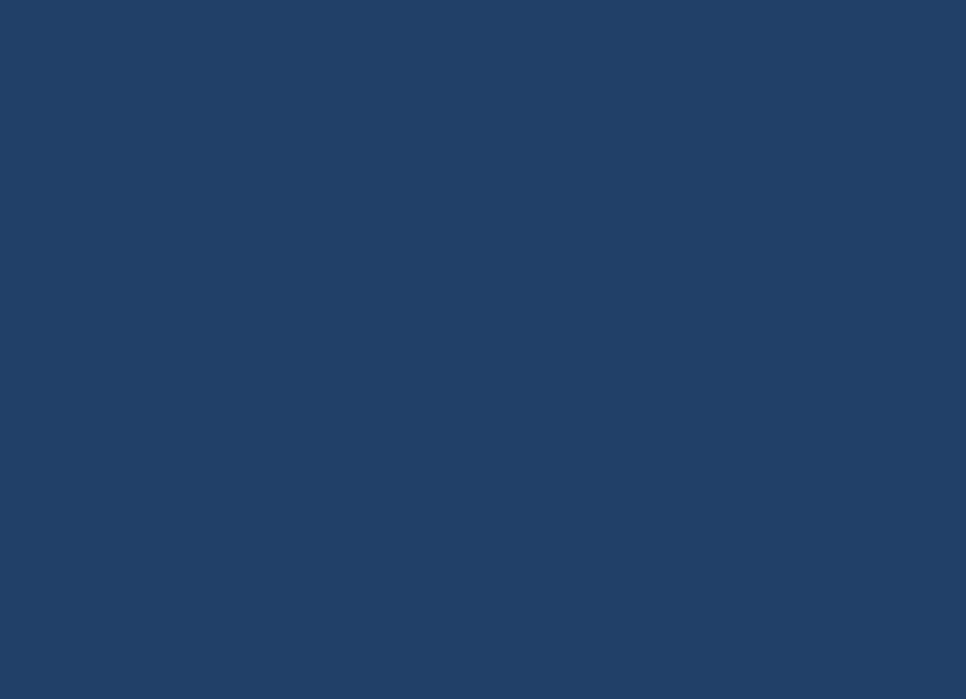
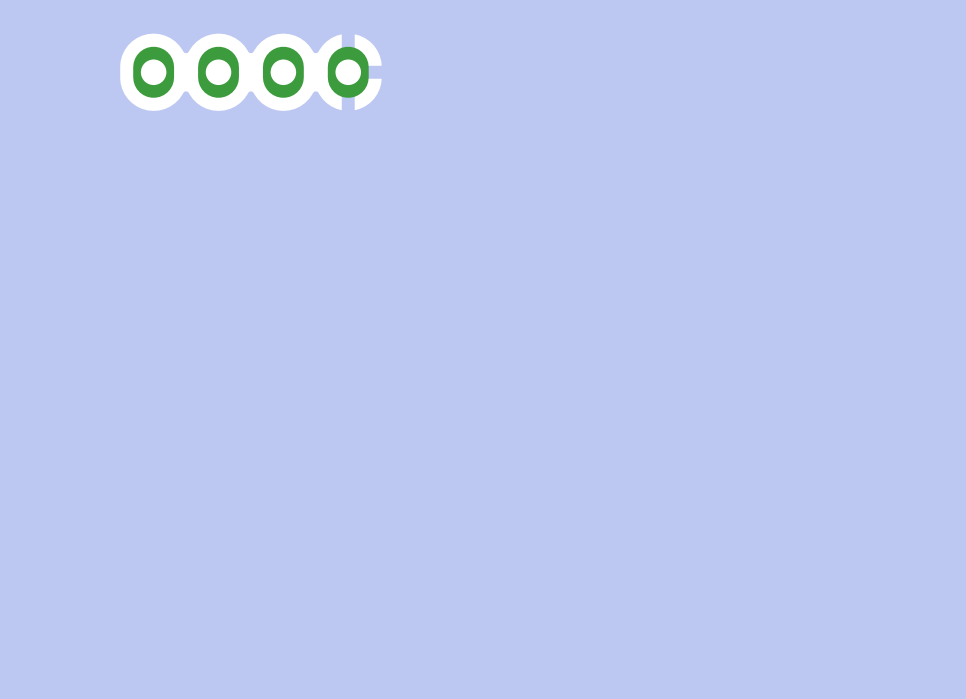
part: none -> (250, 72)

